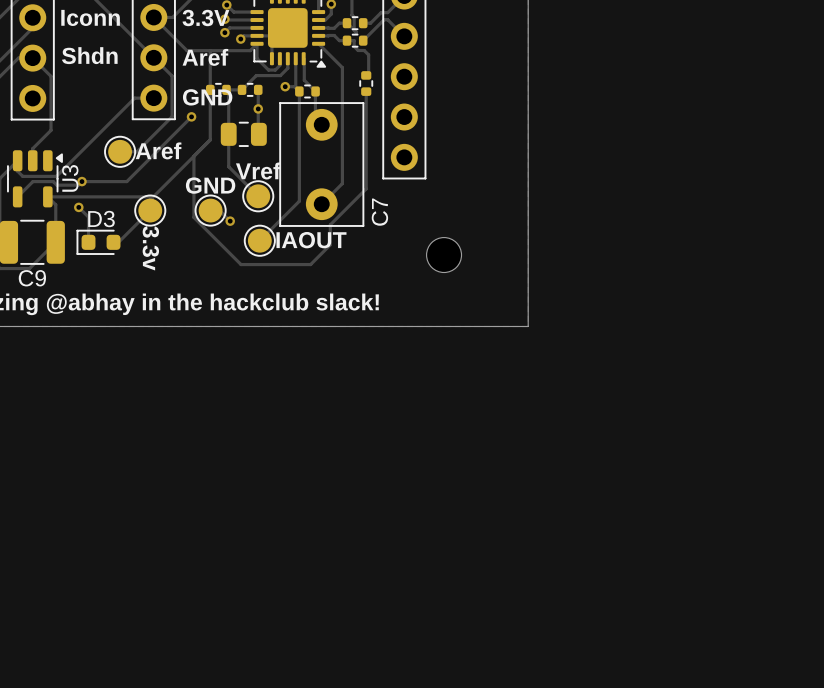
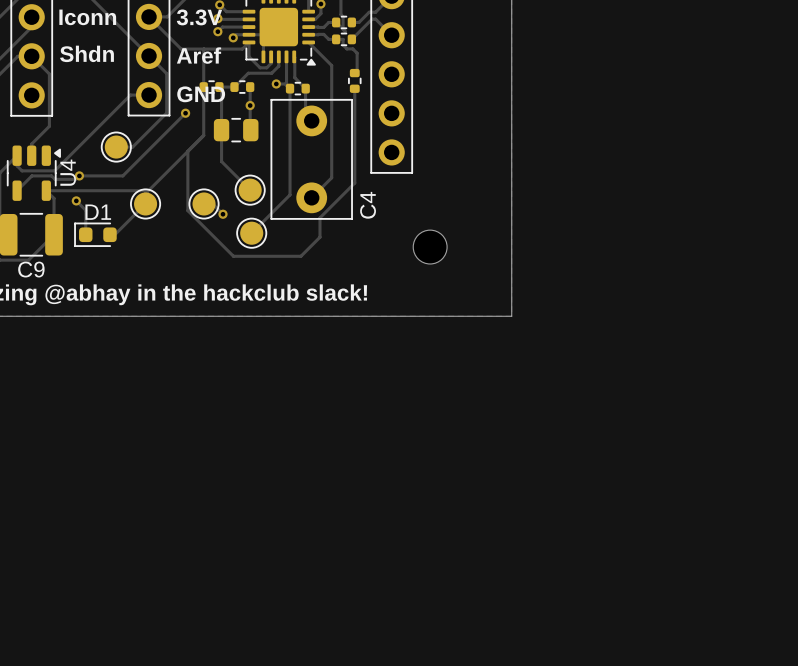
text: Aref (158, 150) -> none
text: Vref (258, 170) -> none
U3 name: U3 (70, 178) -> U4 (68, 172)
text: GND (210, 185) -> none
C7 name: C7 (379, 212) -> C4 (368, 205)
D3 name: D3 (101, 219) -> D1 (98, 212)
text: IAOUT (311, 240) -> none
text: 3.3v (150, 248) -> none

